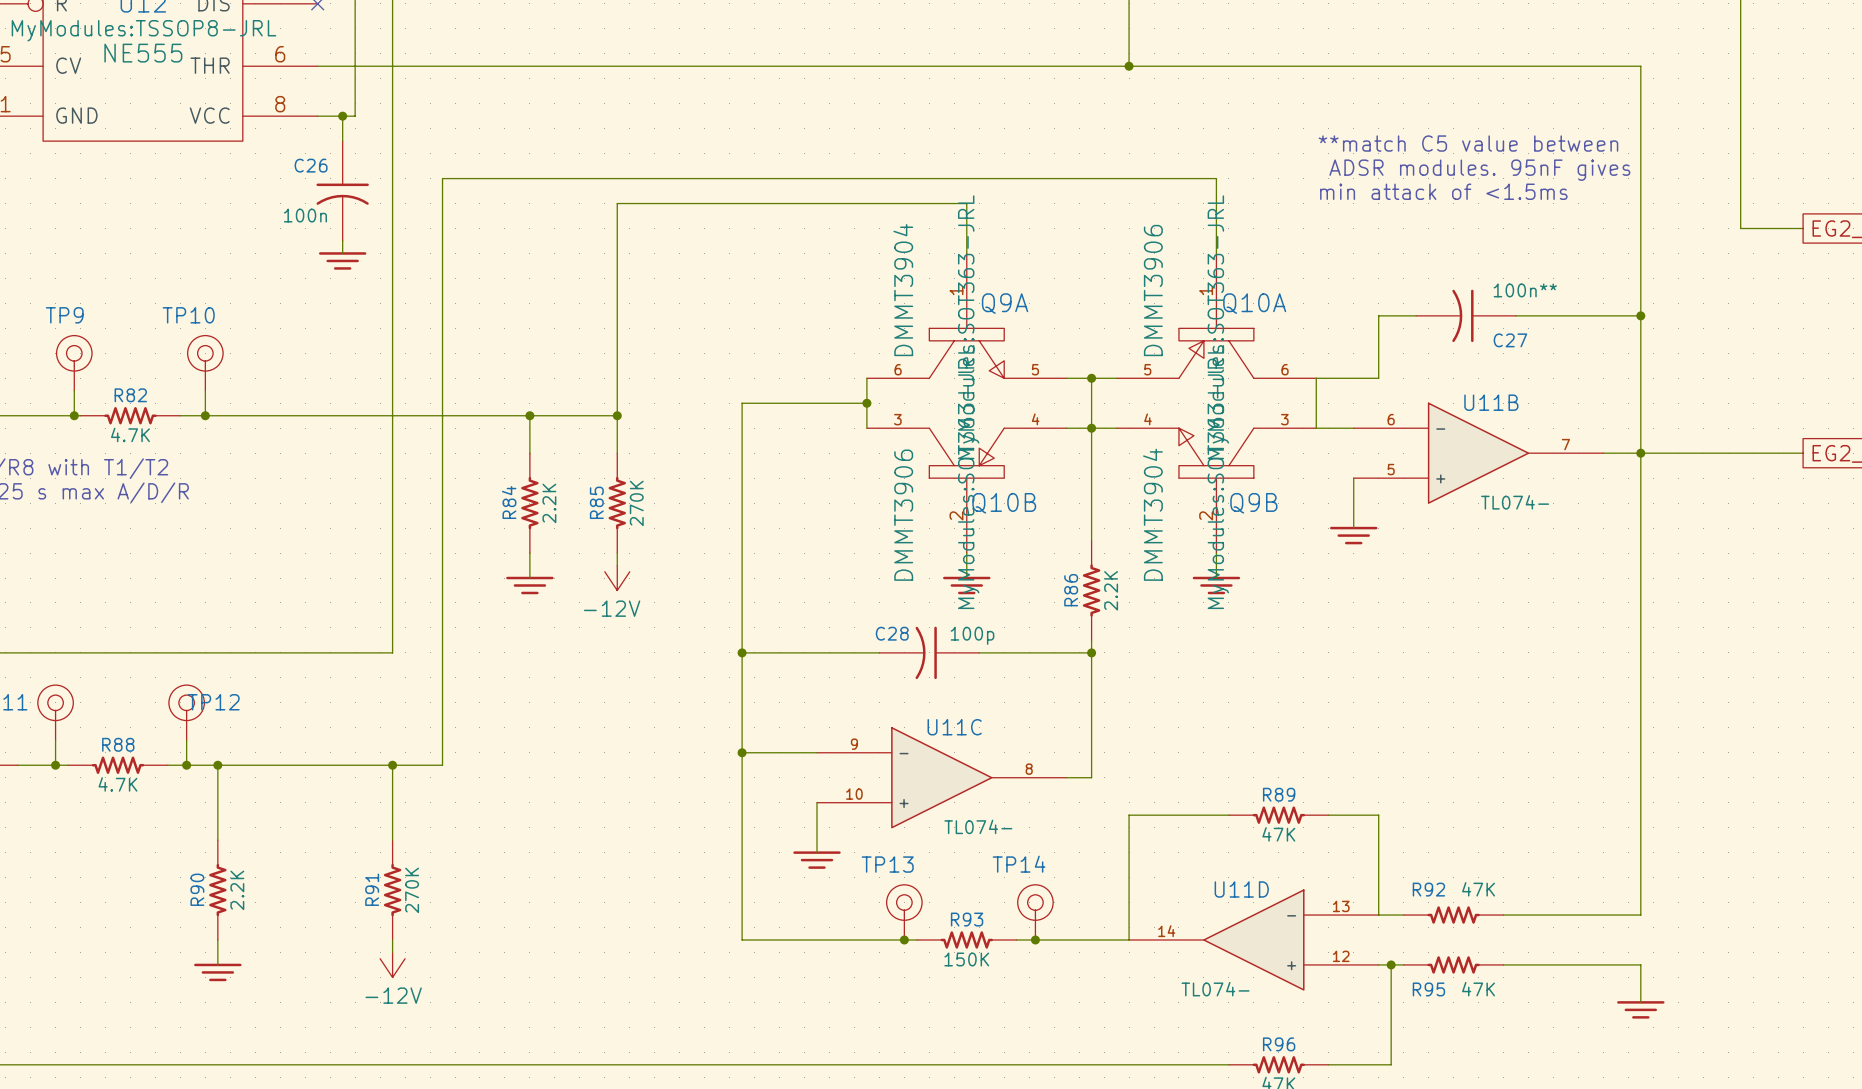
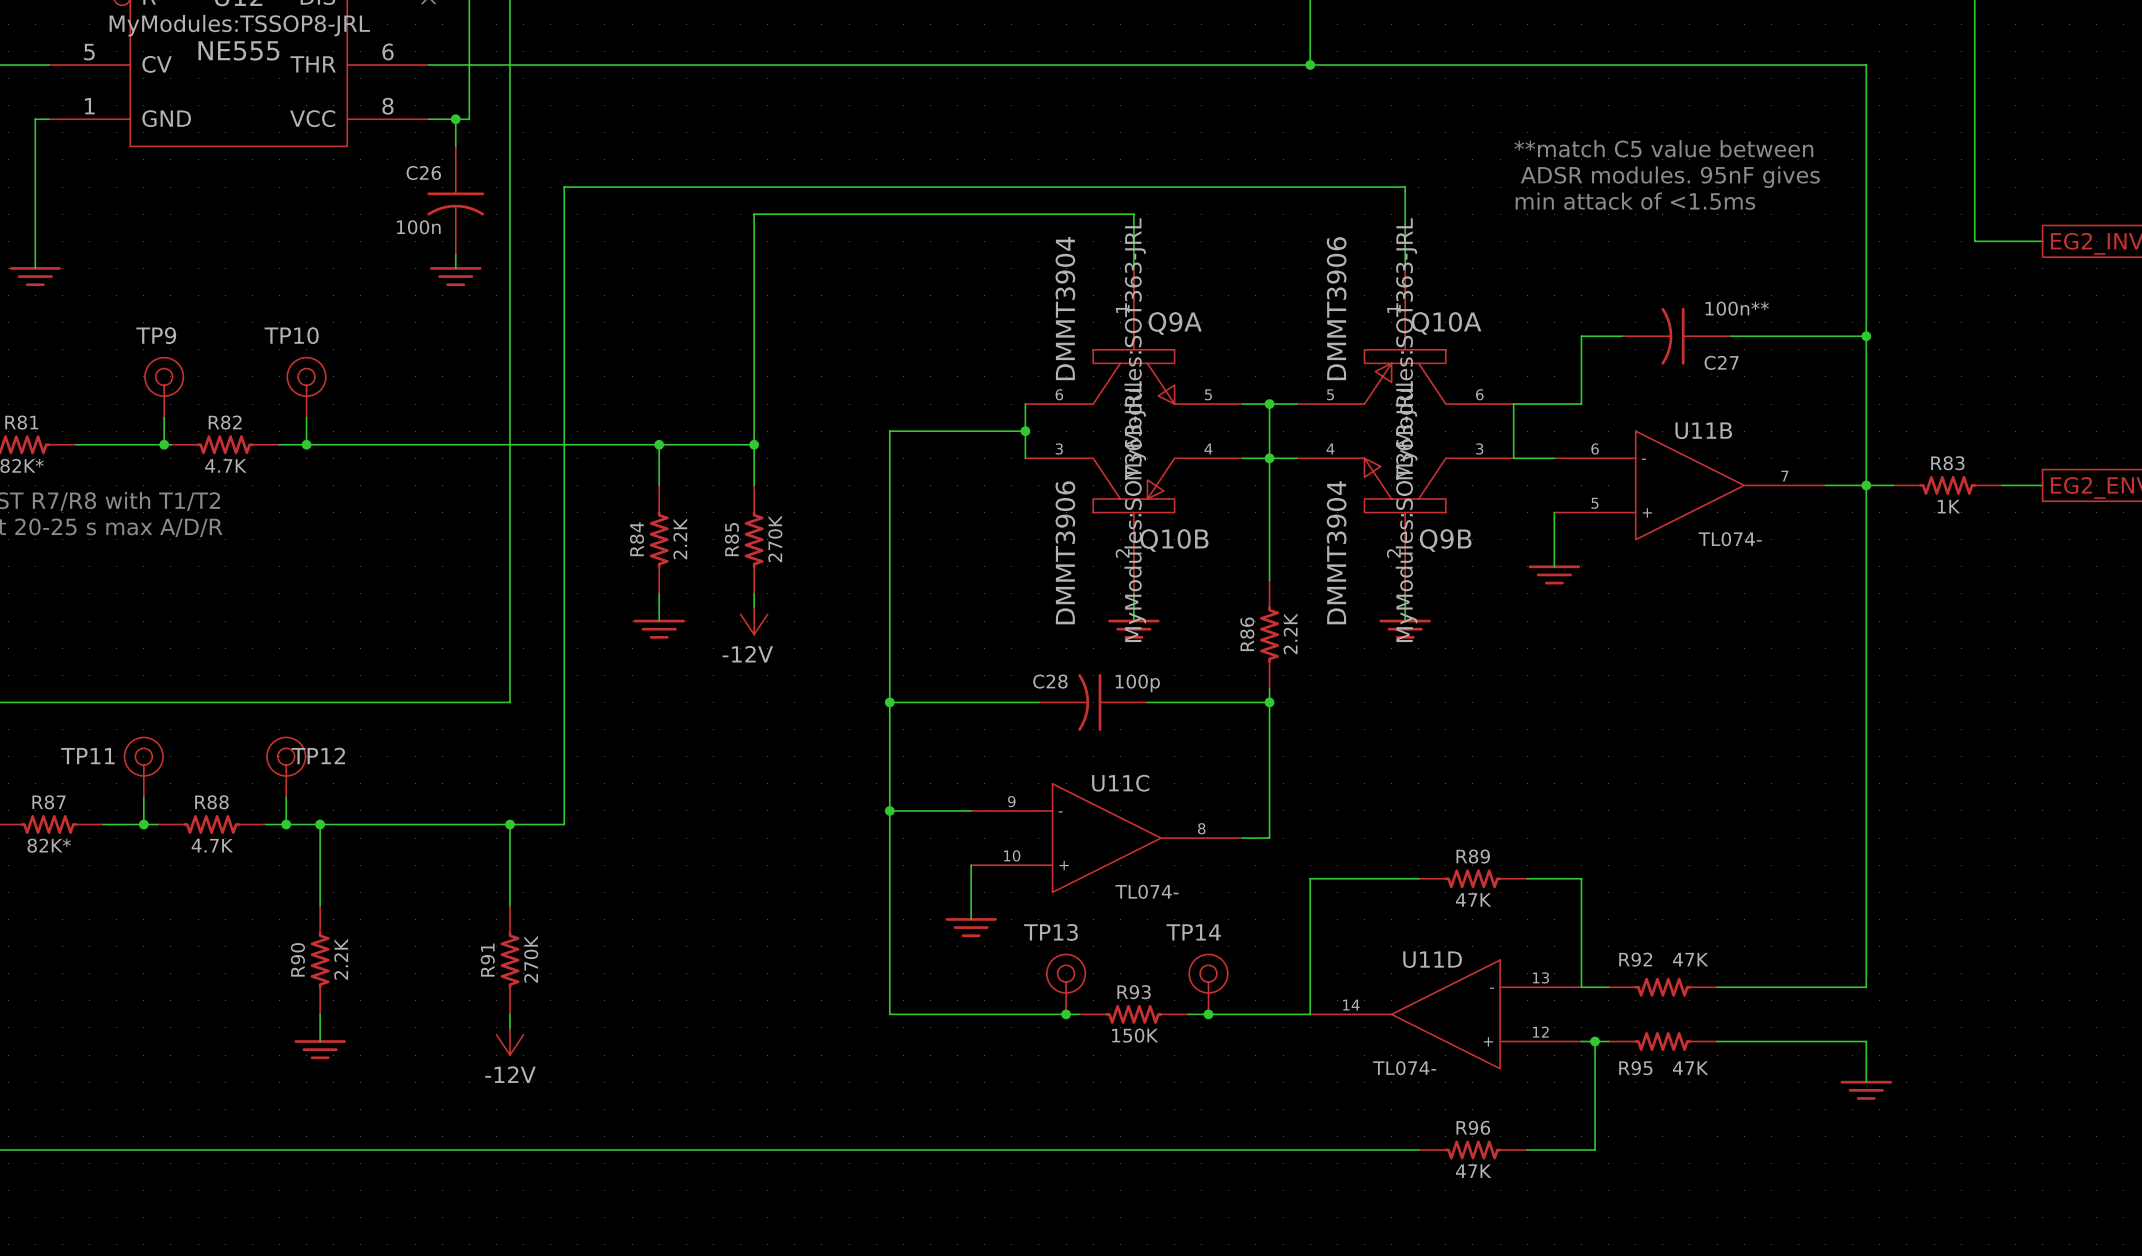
R83: none -> 1K (1947, 485)

